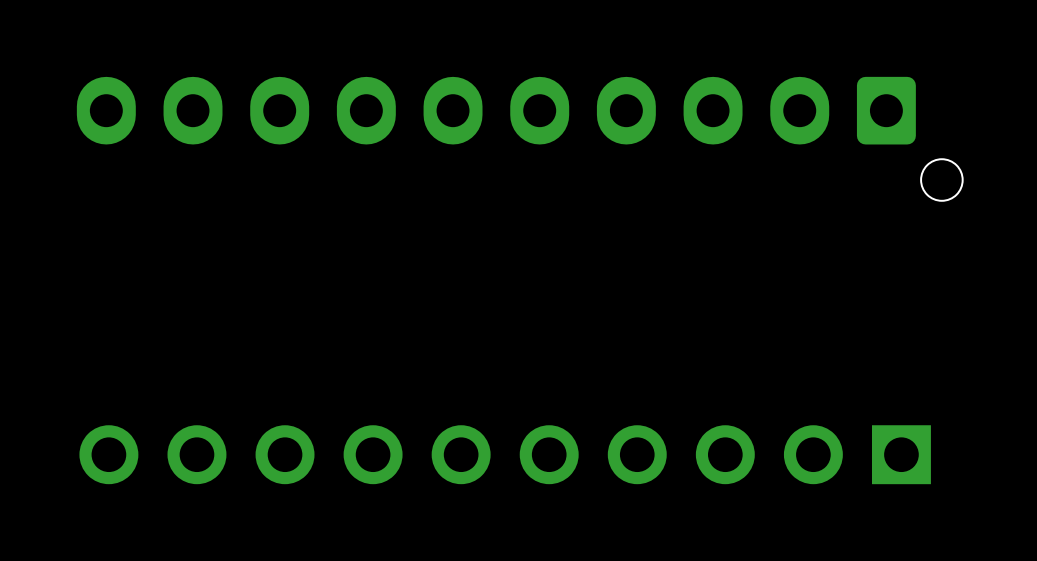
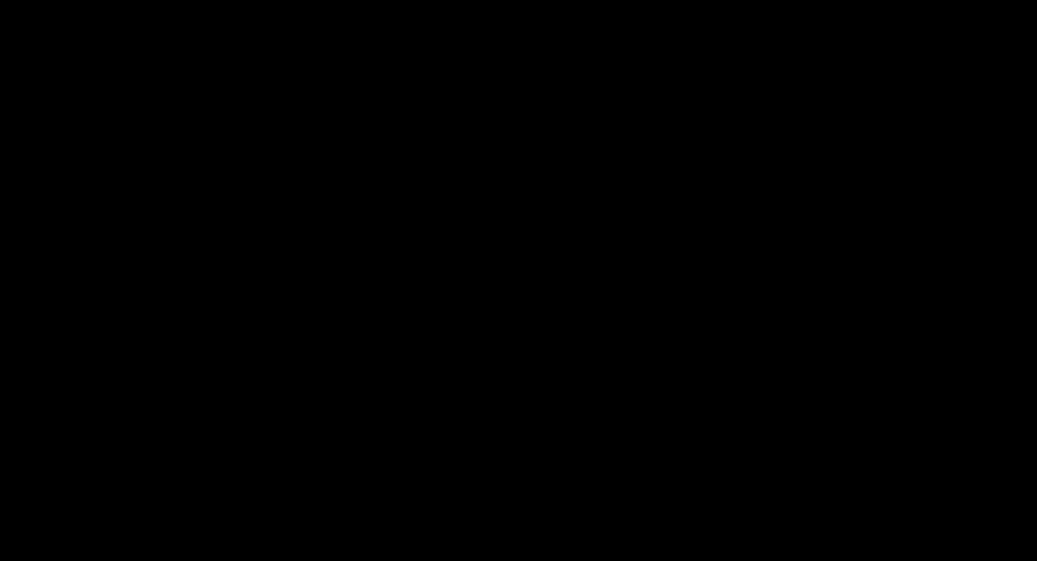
part: (519, 138) -> none
part: (505, 454) -> none

